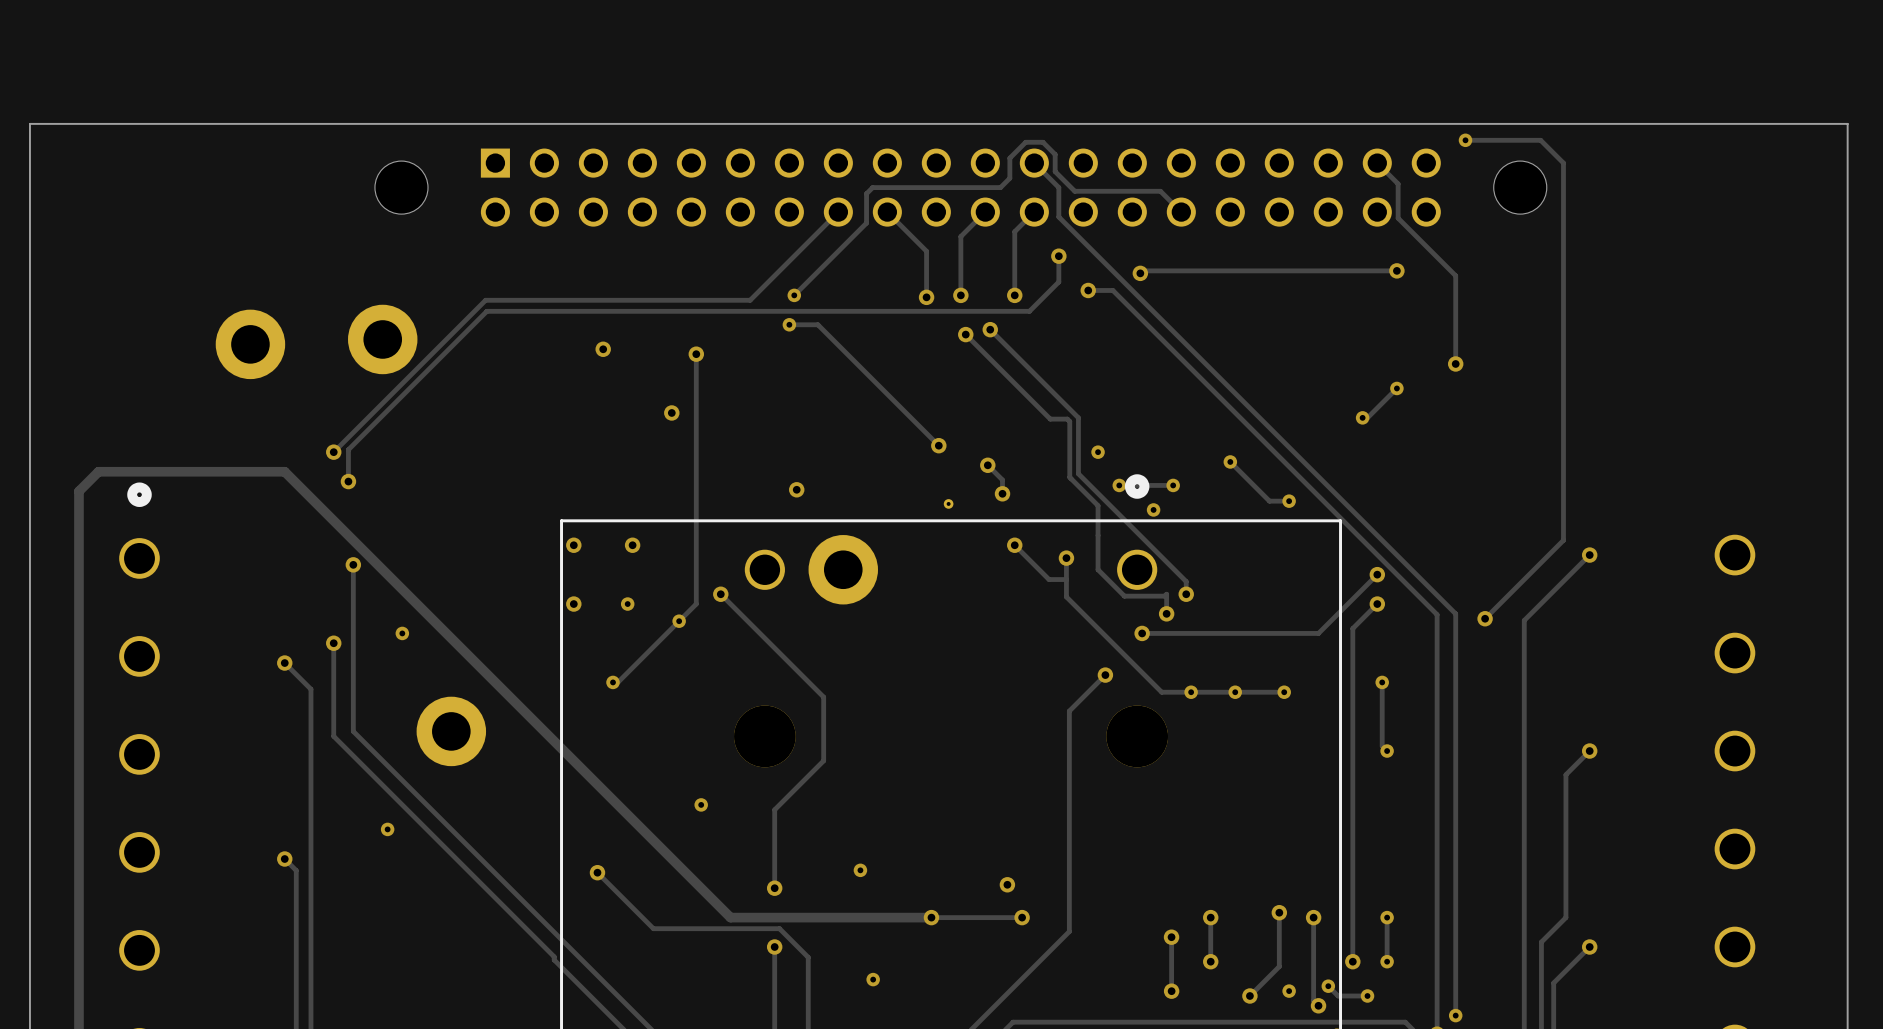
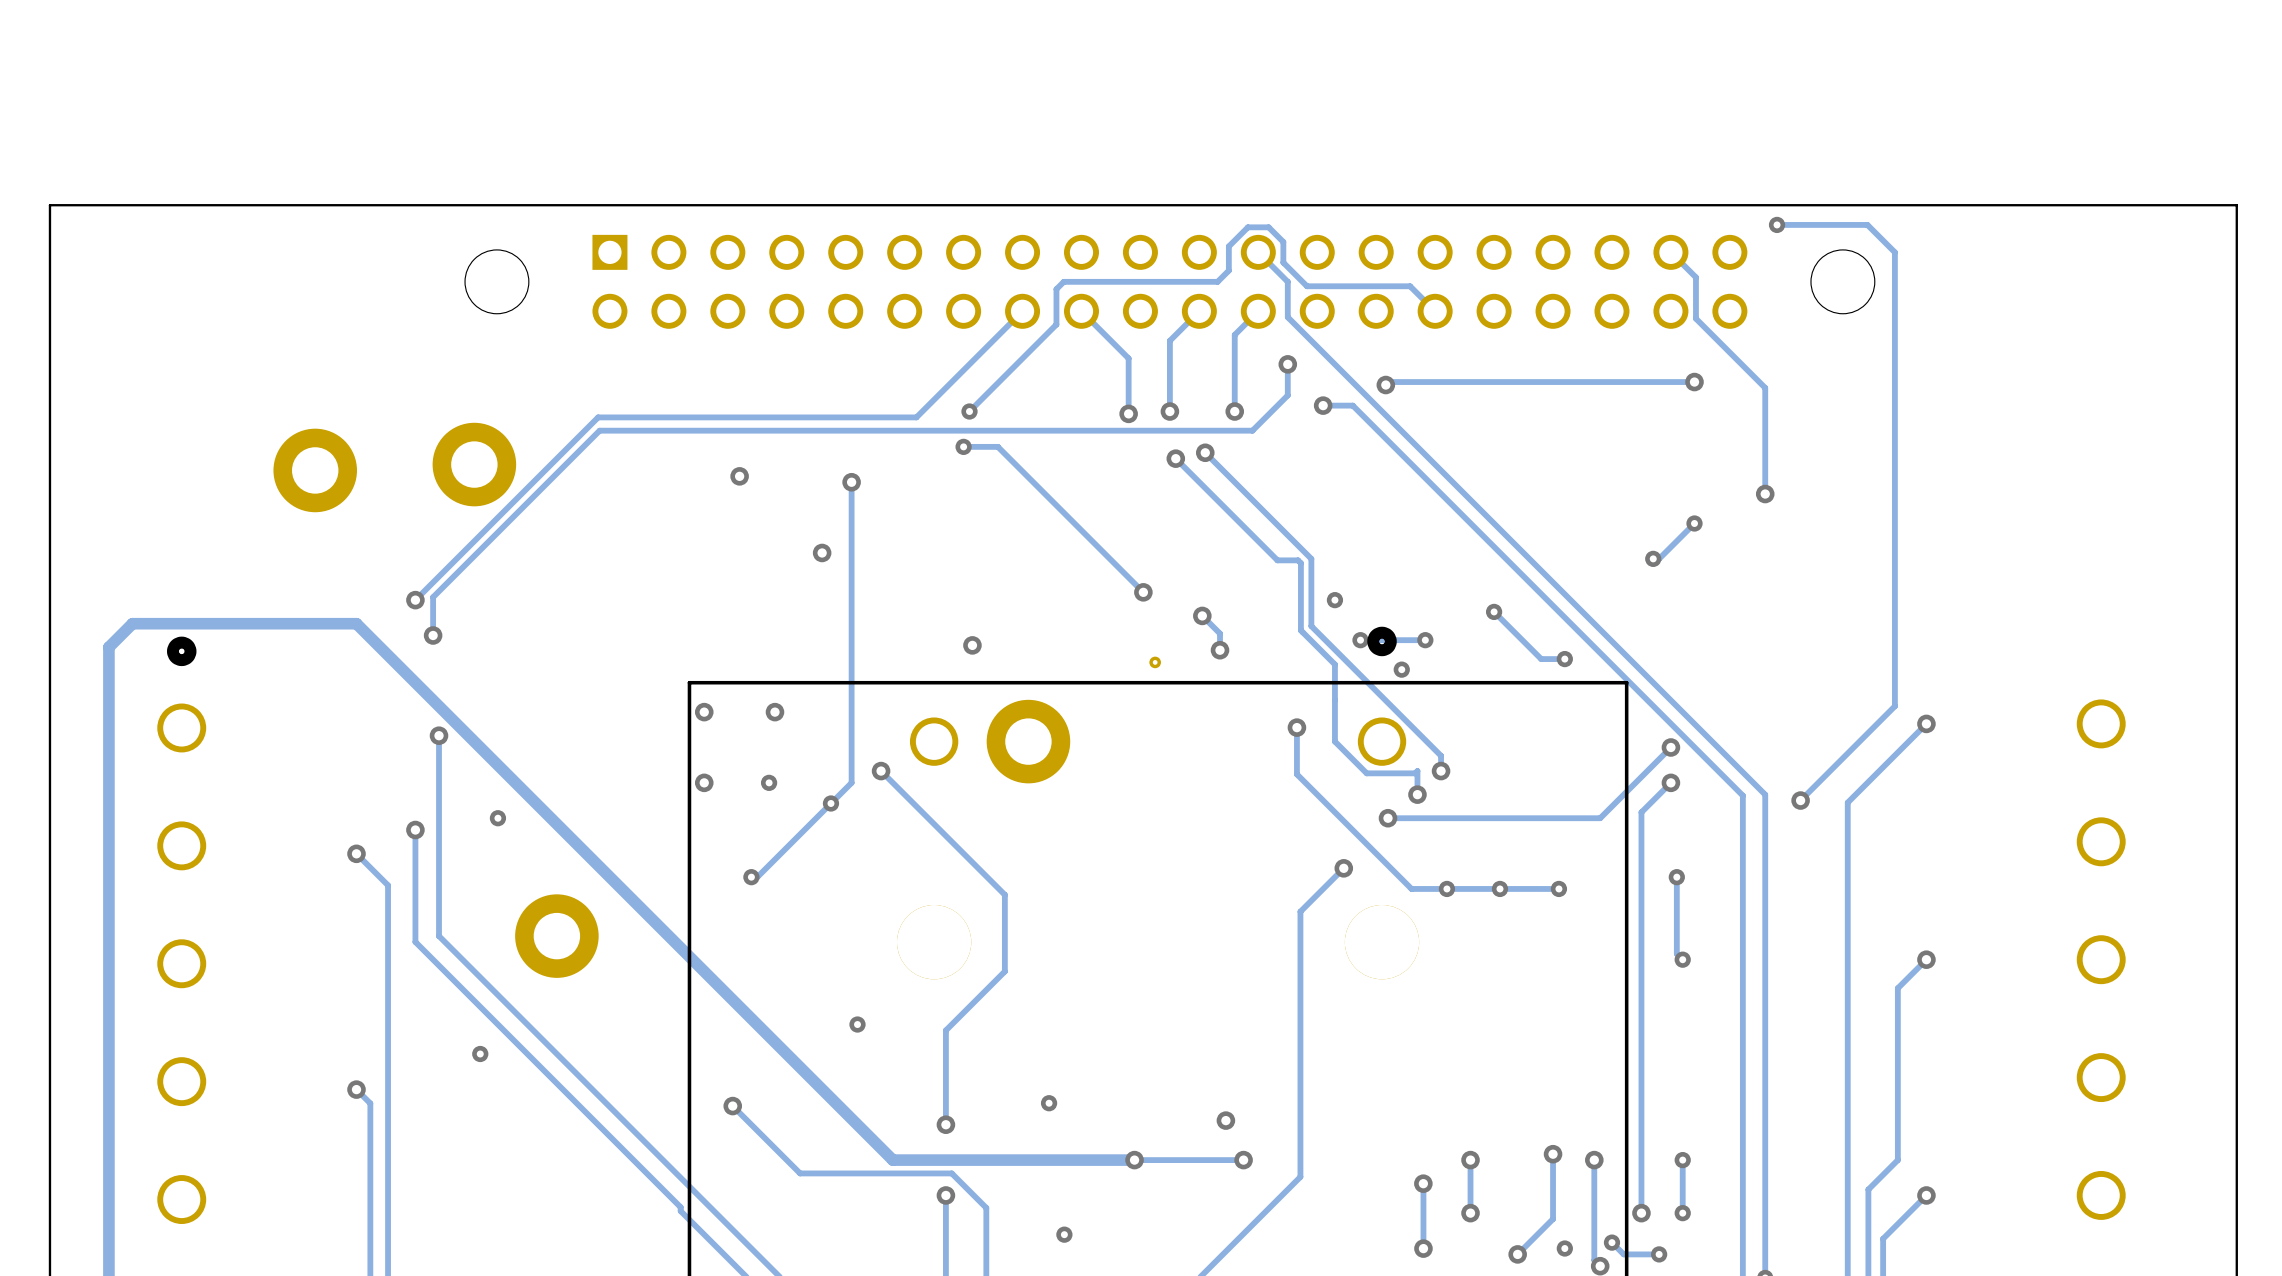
track: (1014, 545) (1049, 579) (1066, 579) -> none
via: (1014, 545) -> none

